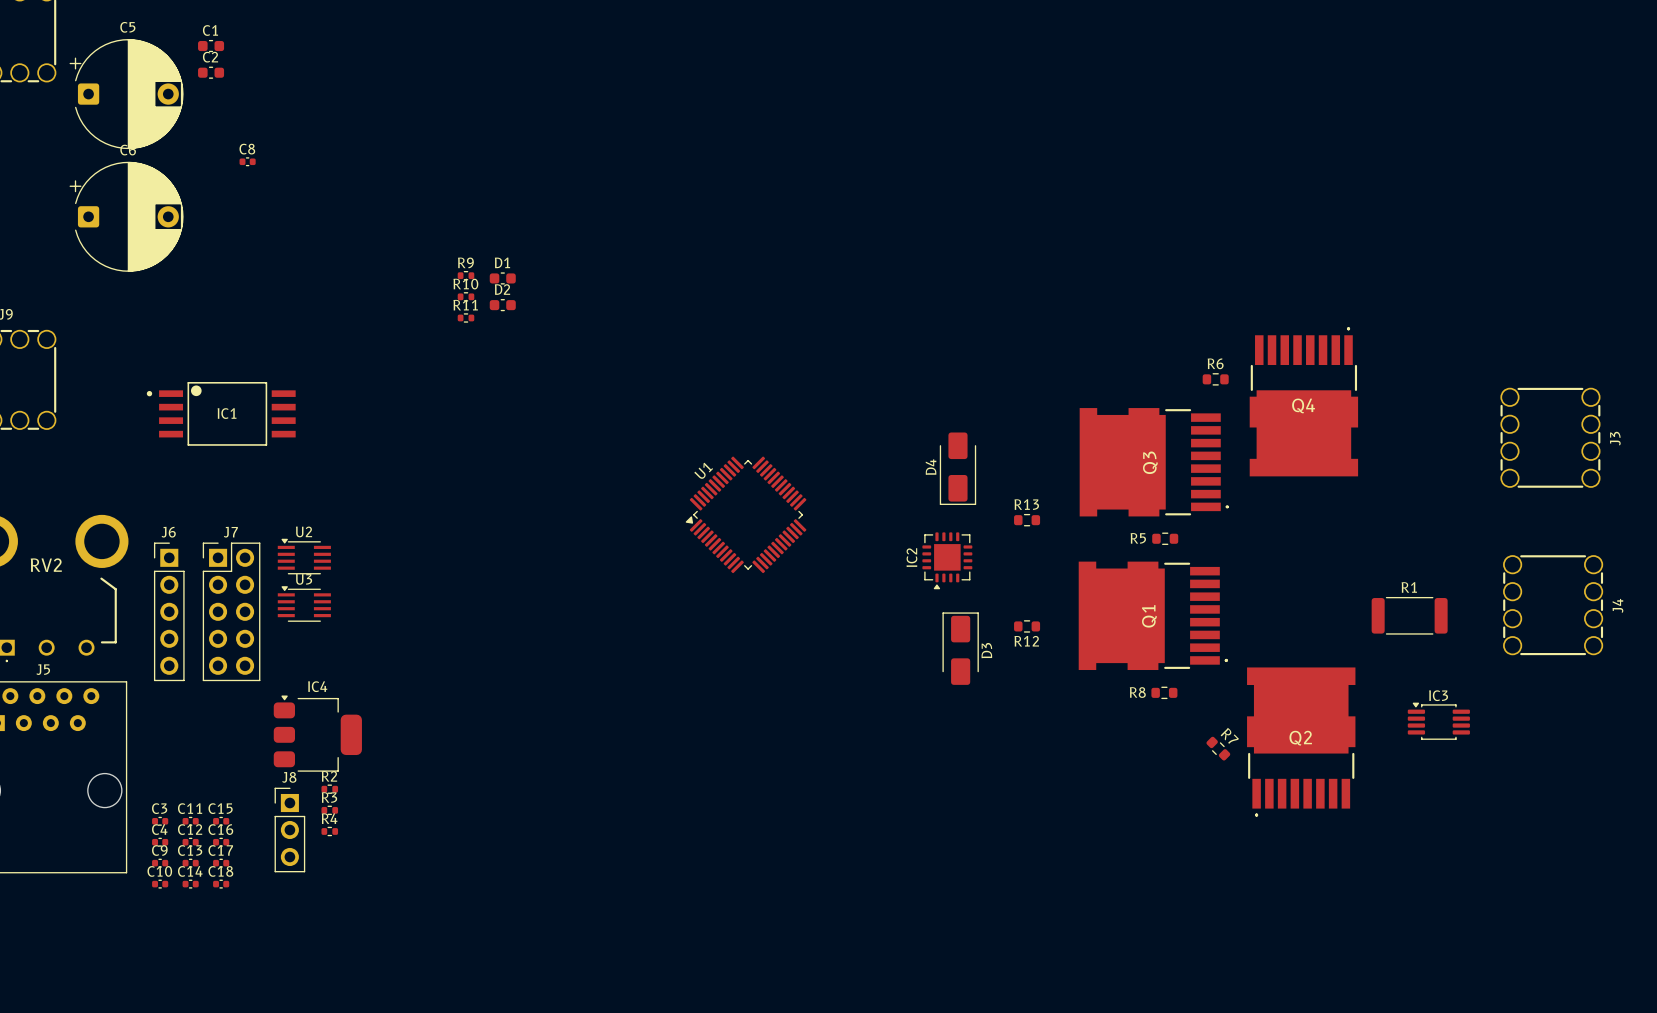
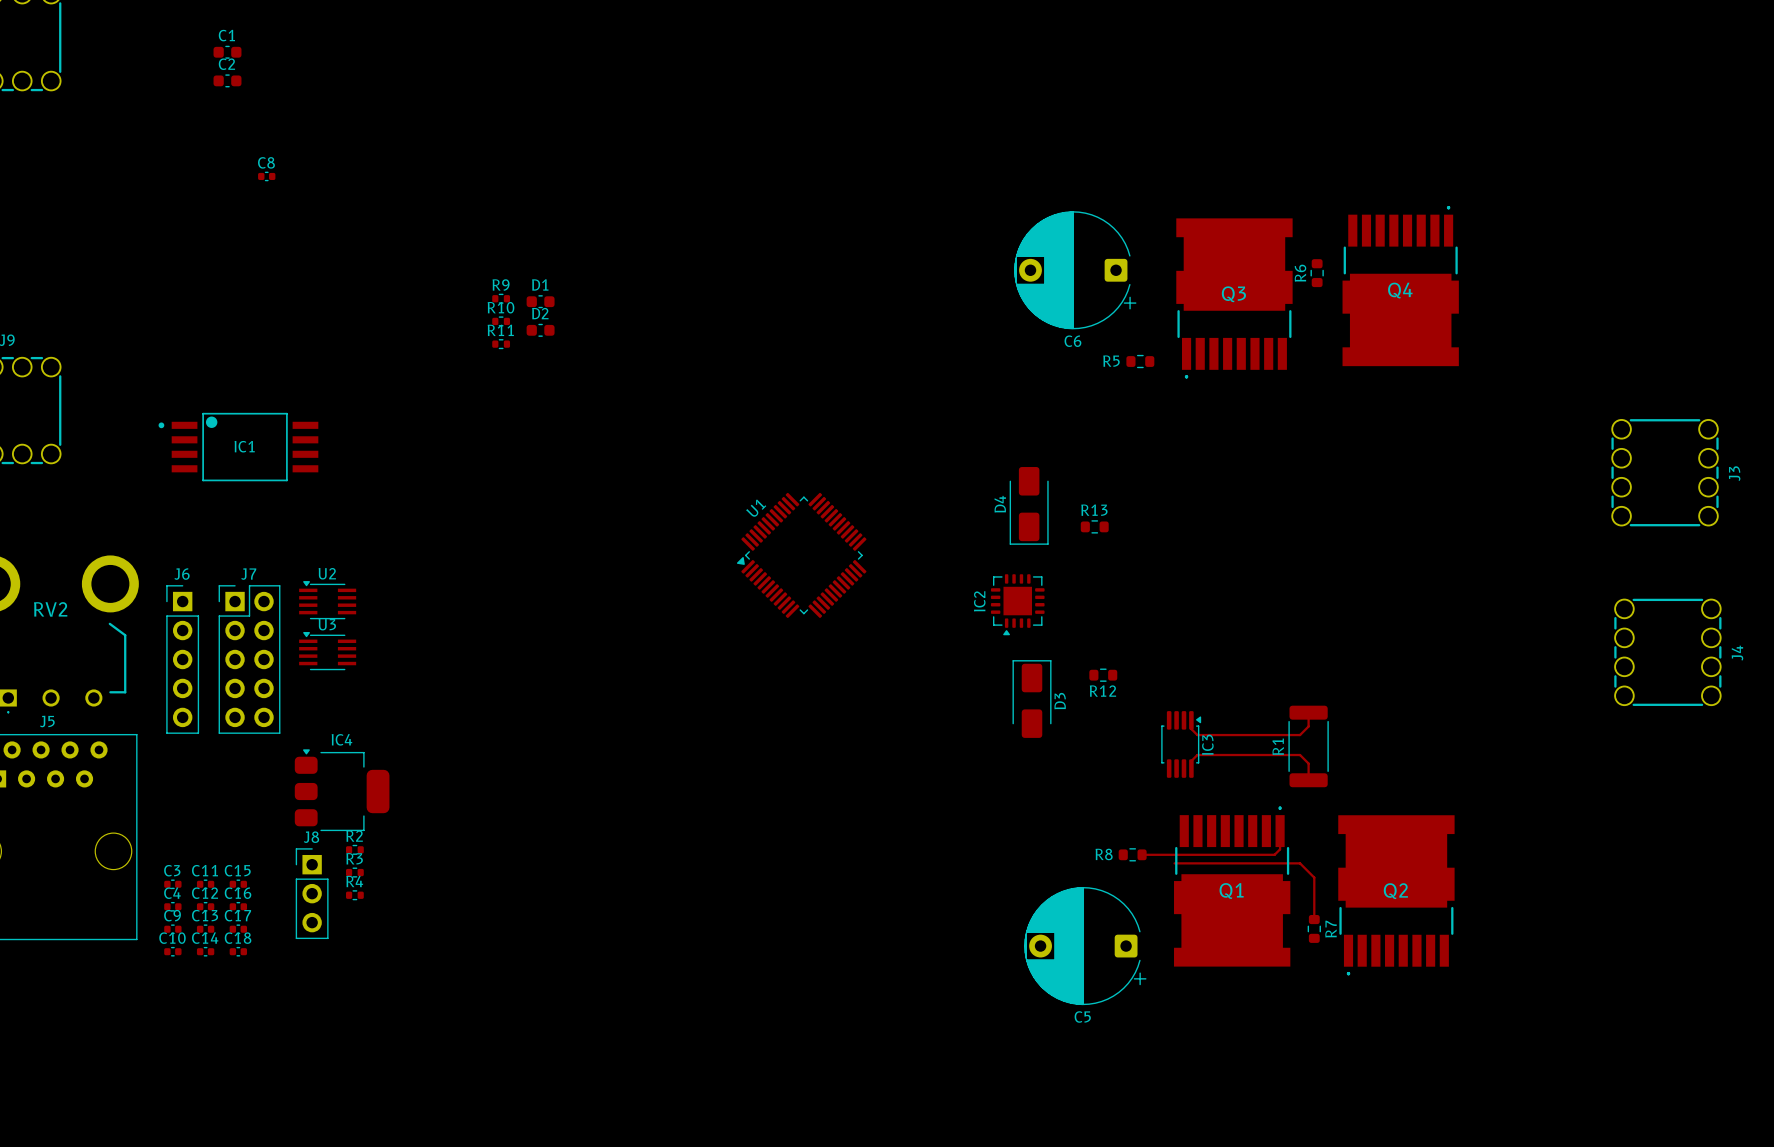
C5 rotation: 0° (126, 94) -> 180° (1085, 946)
C5 position: (126, 94) -> (1085, 946)
C6 rotation: 0° (126, 216) -> 180° (1075, 270)
C6 position: (126, 216) -> (1075, 270)
R6 name position: R6 (1215, 363) -> R6 (1300, 273)
R6 rotation: 0° (1215, 379) -> 90° clockwise (1317, 273)
R6 position: (1215, 379) -> (1317, 273)
Q4 position: (1303, 401) -> (1400, 286)
Q3 rotation: 0° (1154, 462) -> 90° clockwise (1234, 298)
Q3 position: (1154, 462) -> (1234, 298)
R13 position: (1027, 520) -> (1094, 526)
R5 position: (1165, 538) -> (1140, 361)
R1 name position: R1 (1409, 587) -> R1 (1278, 746)
Q1 rotation: 0° (1153, 615) -> 90° counterclockwise (1232, 886)
Q1 position: (1153, 615) -> (1232, 886)
R1 rotation: 0° (1409, 615) -> 90° clockwise (1308, 746)
R1 position: (1409, 615) -> (1308, 746)
top track: none -> (1308, 712) (1308, 726) (1300, 735) (1197, 735) (1191, 729) (1191, 720)
R8 position: (1164, 692) -> (1132, 854)
top track: none -> (1191, 768) (1191, 761) (1197, 755) (1300, 755) (1308, 763) (1308, 780)
IC3 rotation: 0° (1438, 721) -> 90° clockwise (1181, 744)
IC3 position: (1438, 721) -> (1181, 744)
Q2 position: (1301, 742) -> (1396, 895)
R7 rotation: 0° (1218, 748) -> 45° clockwise (1314, 928)
R7 position: (1218, 748) -> (1314, 928)
top track: none -> (1280, 831) (1280, 849) (1274, 854) (1142, 854)
top track: none -> (1174, 863) (1300, 863) (1314, 877) (1314, 919)

